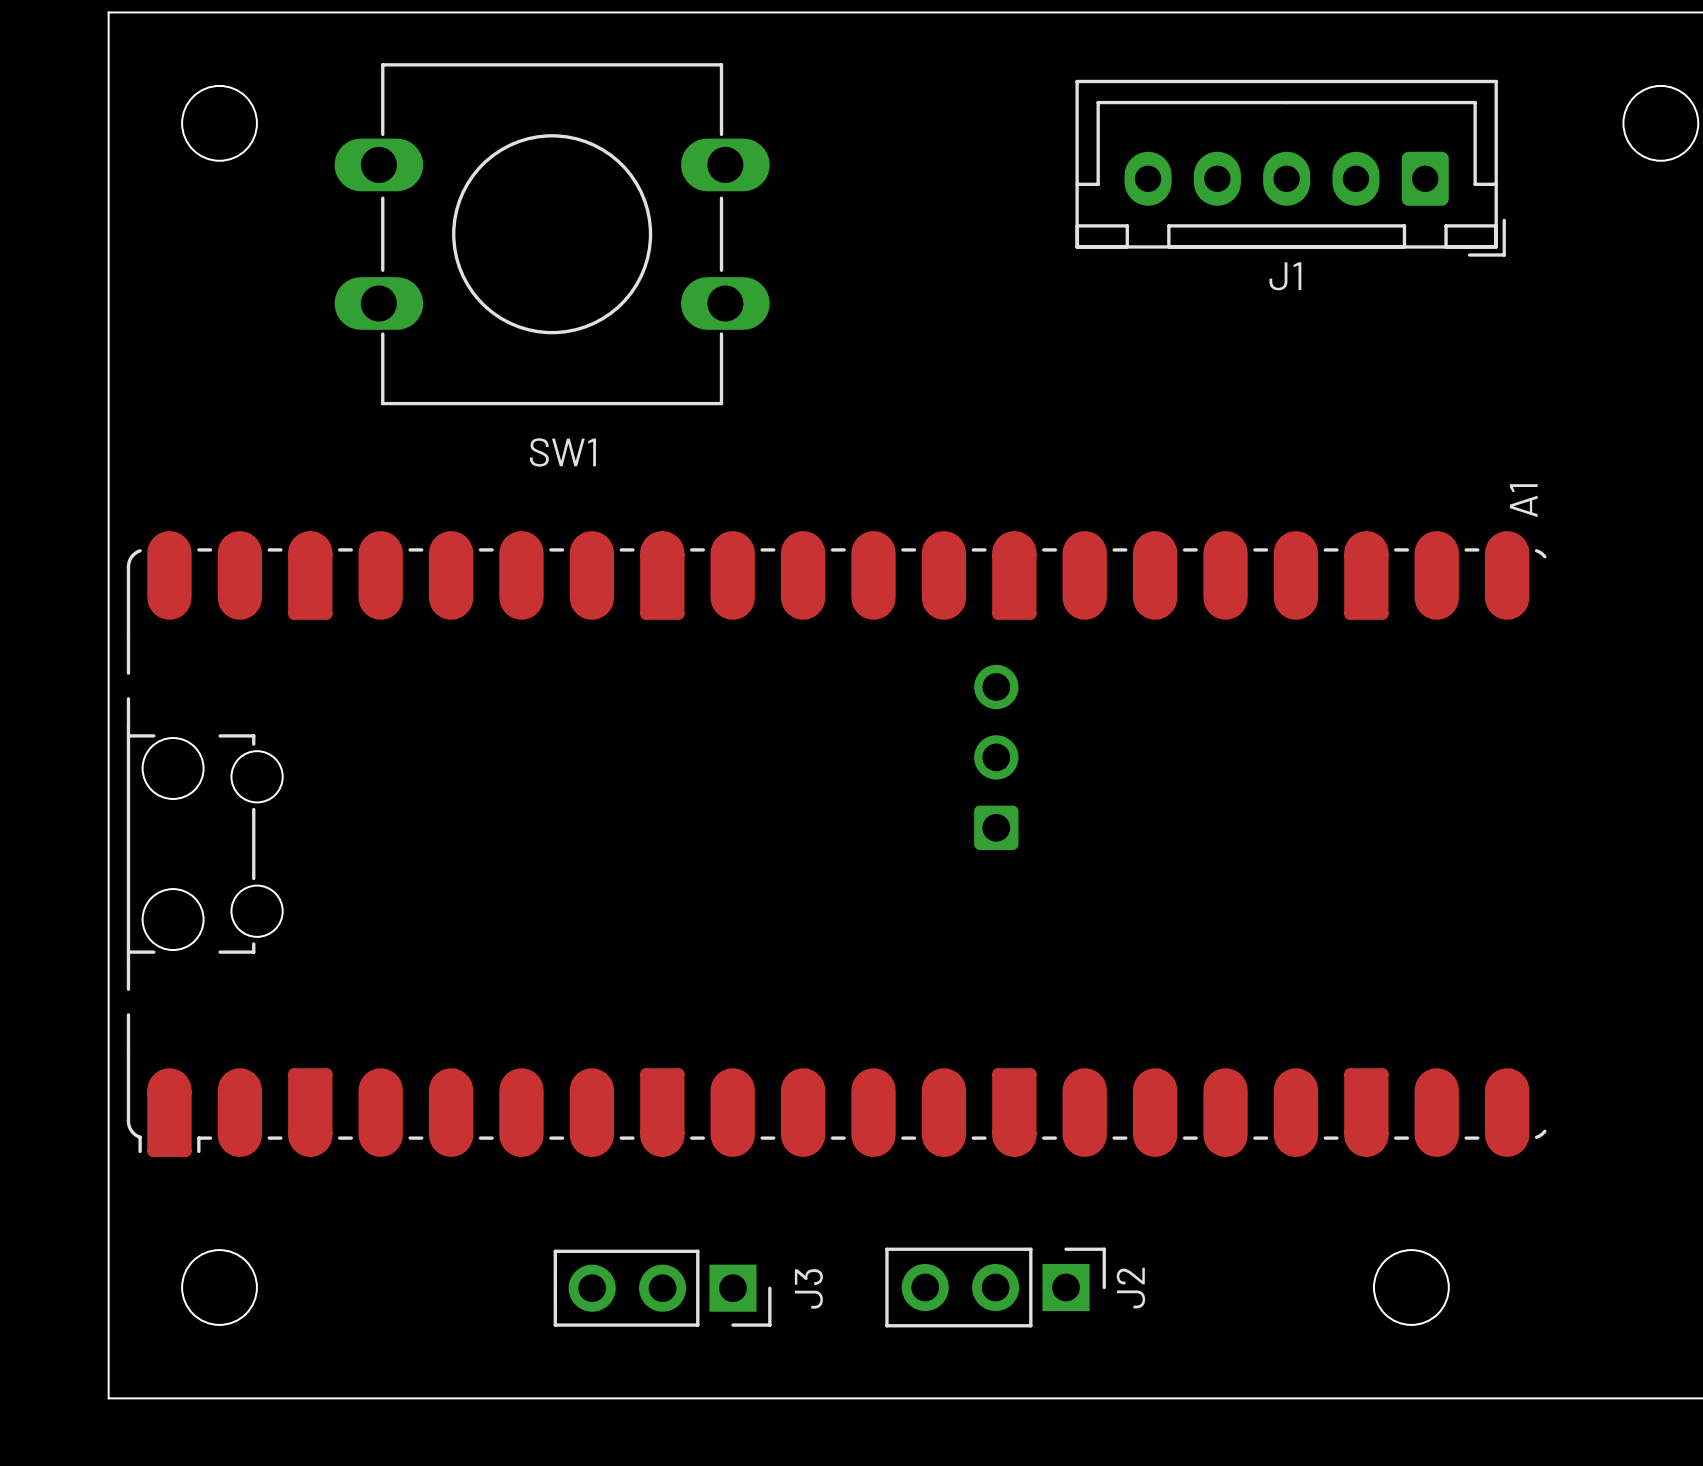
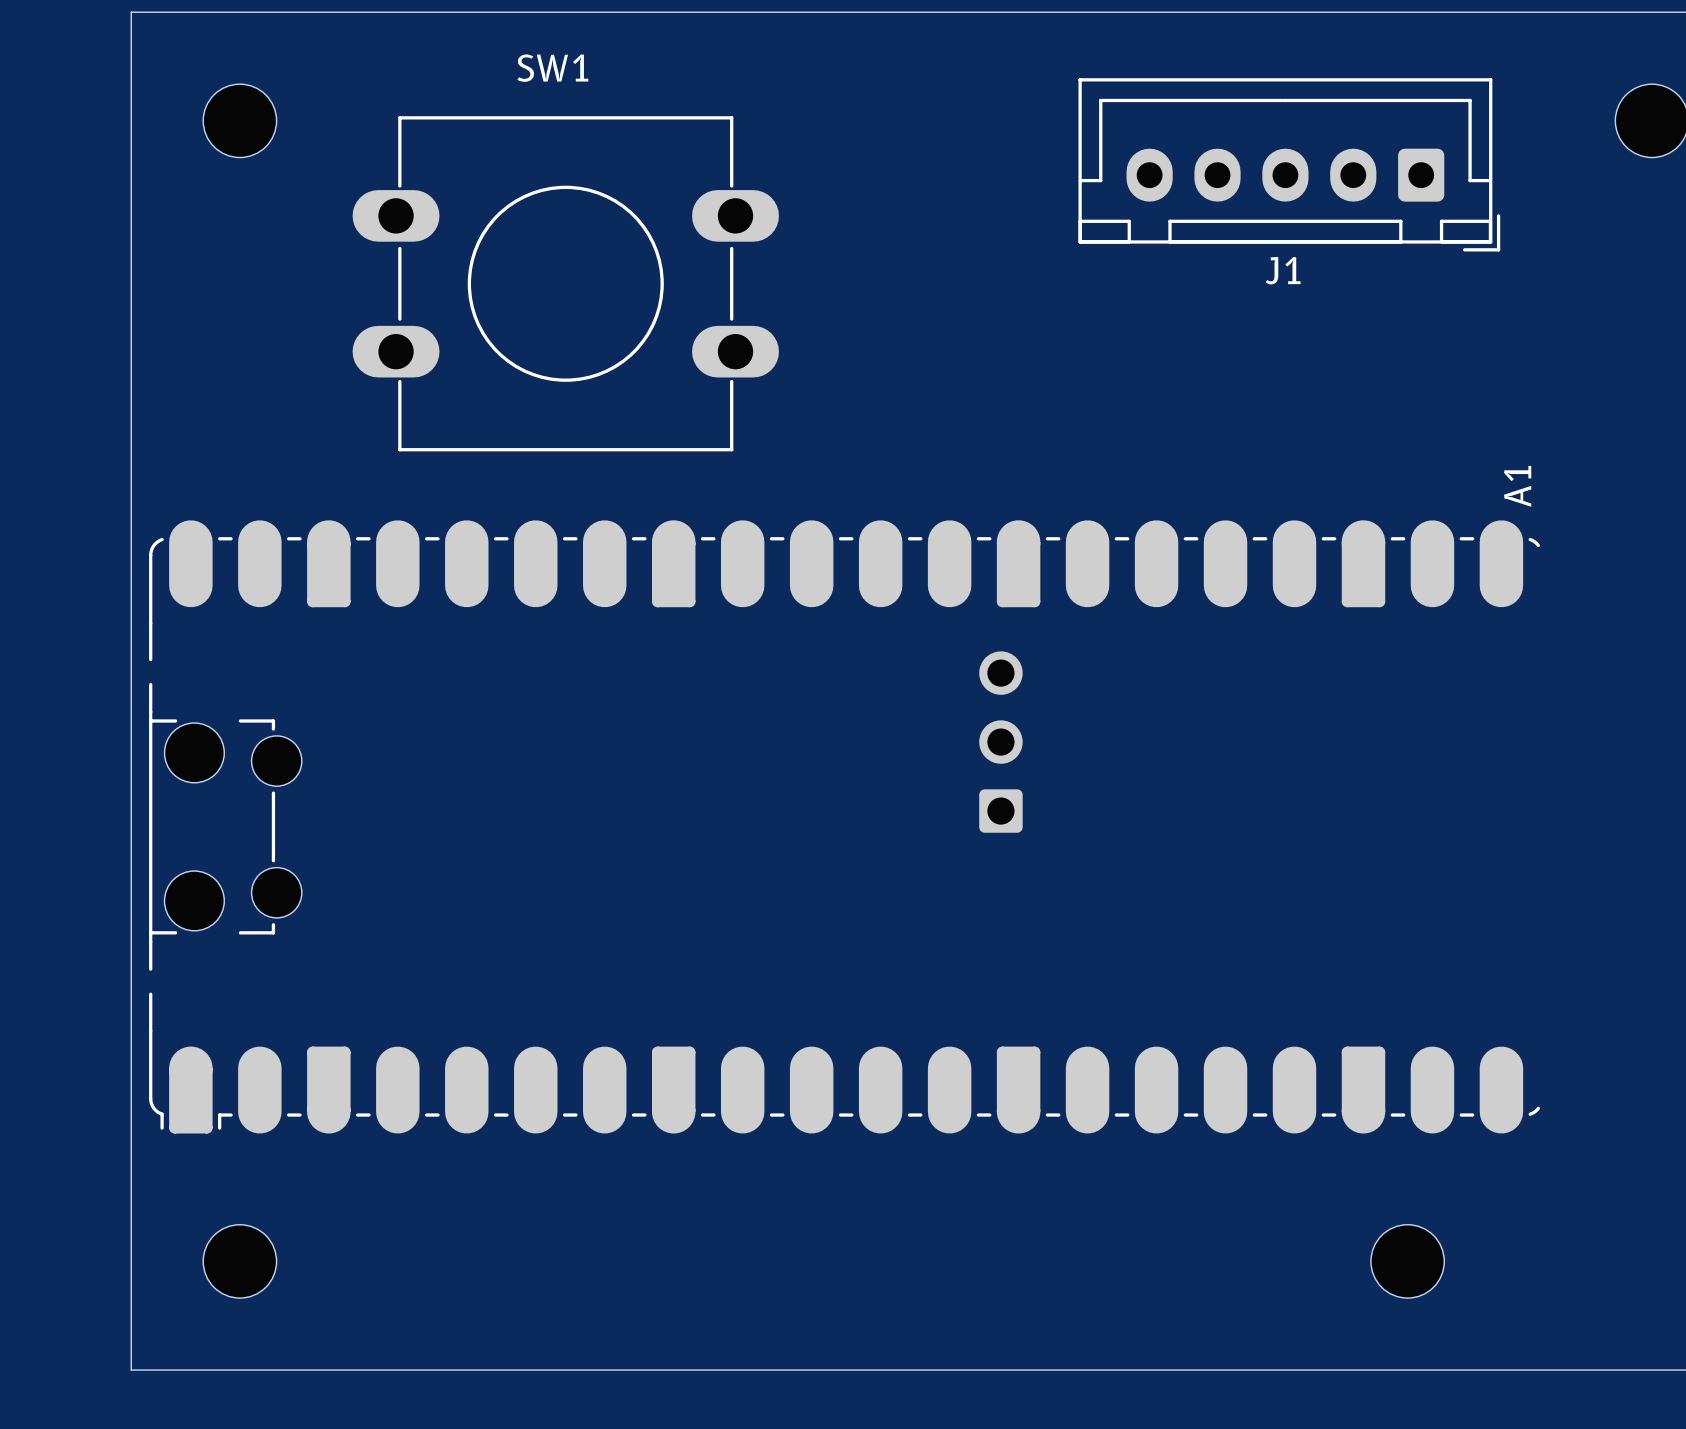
SW1 position: (552, 234) -> (565, 283)
SW1 name position: SW1 (562, 452) -> SW1 (552, 68)
J2: (995, 1287) -> none
J3: (662, 1288) -> none

